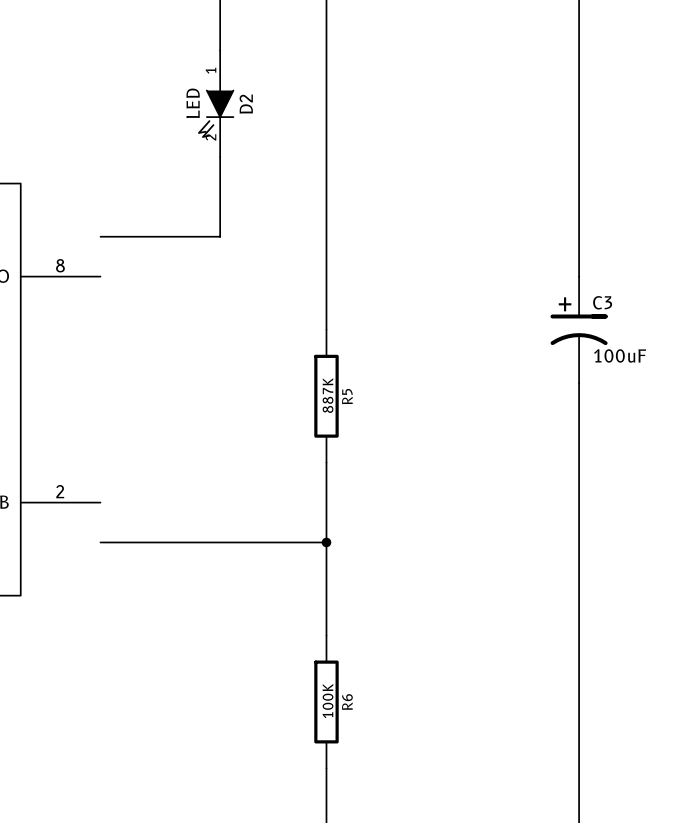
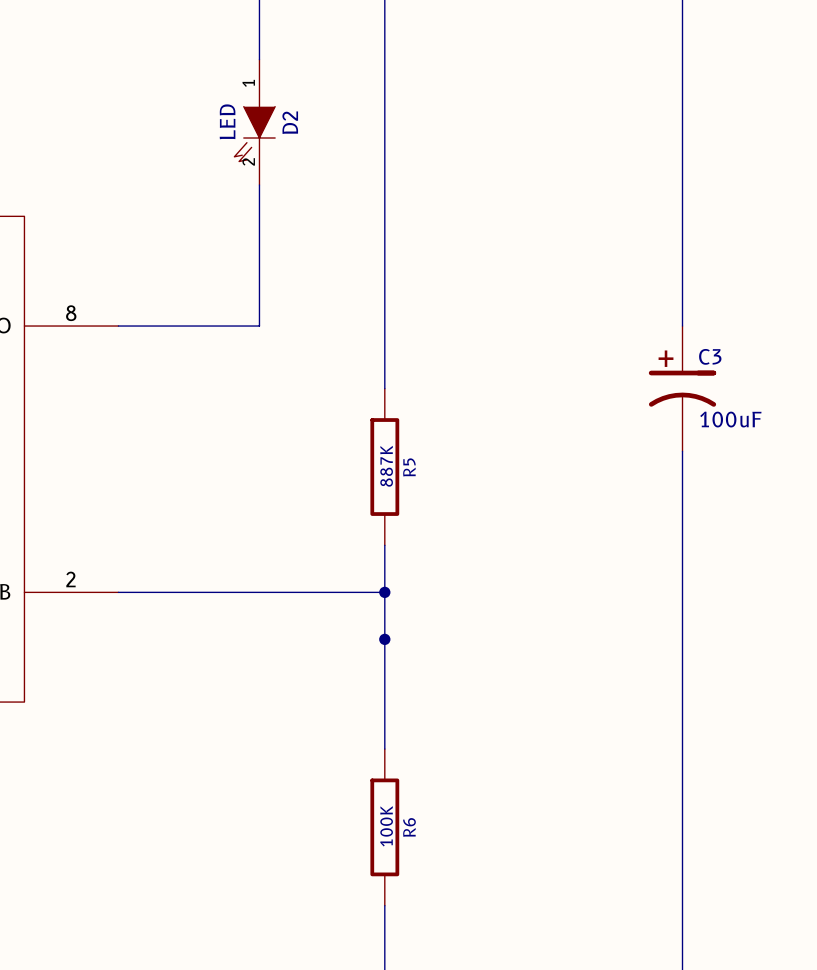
wire: (100, 236) (220, 236) -> (118, 326) (259, 326) (259, 279)
junction: none -> (384, 592)
wire: (100, 542) (326, 542) -> (118, 592) (384, 592)

